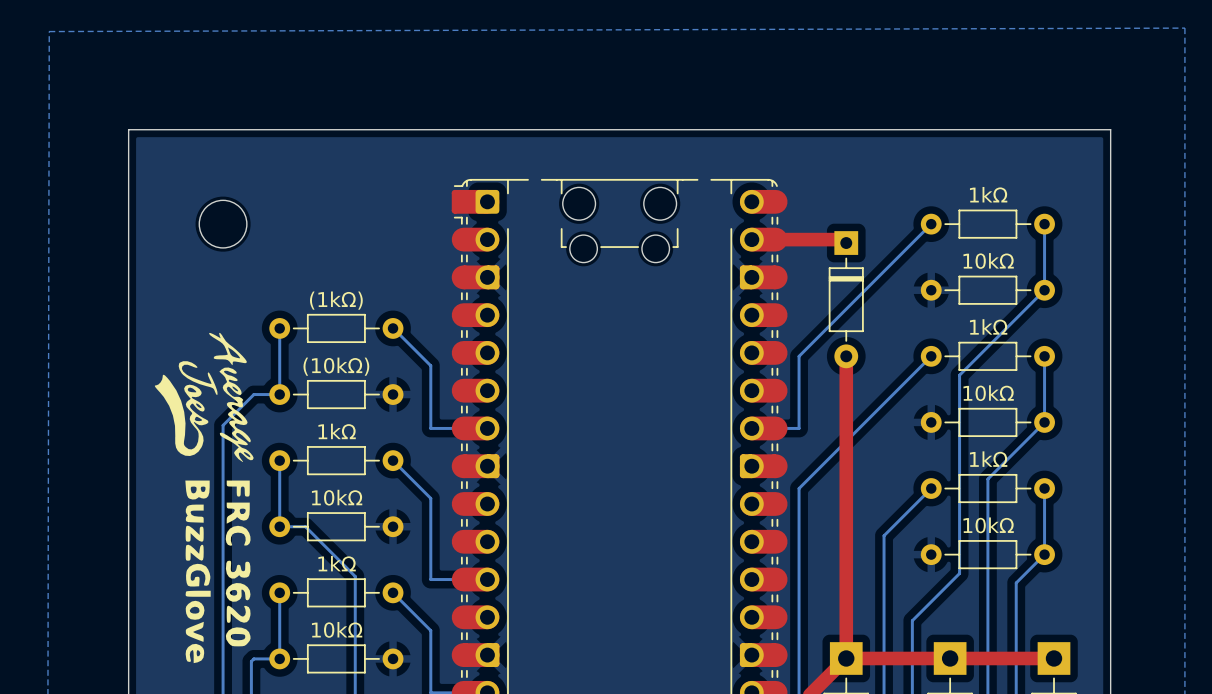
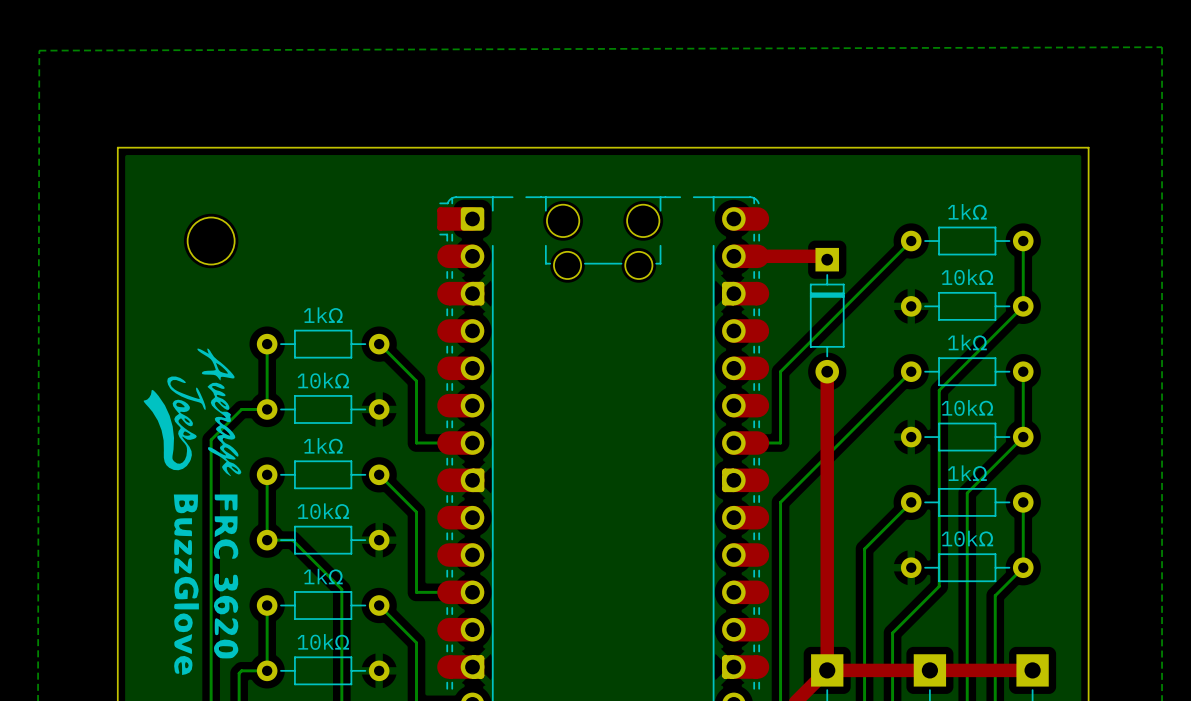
part value: (1kΩ) (336, 300) -> 1kΩ (323, 315)
part value: (10kΩ) (336, 366) -> 10kΩ (323, 380)

